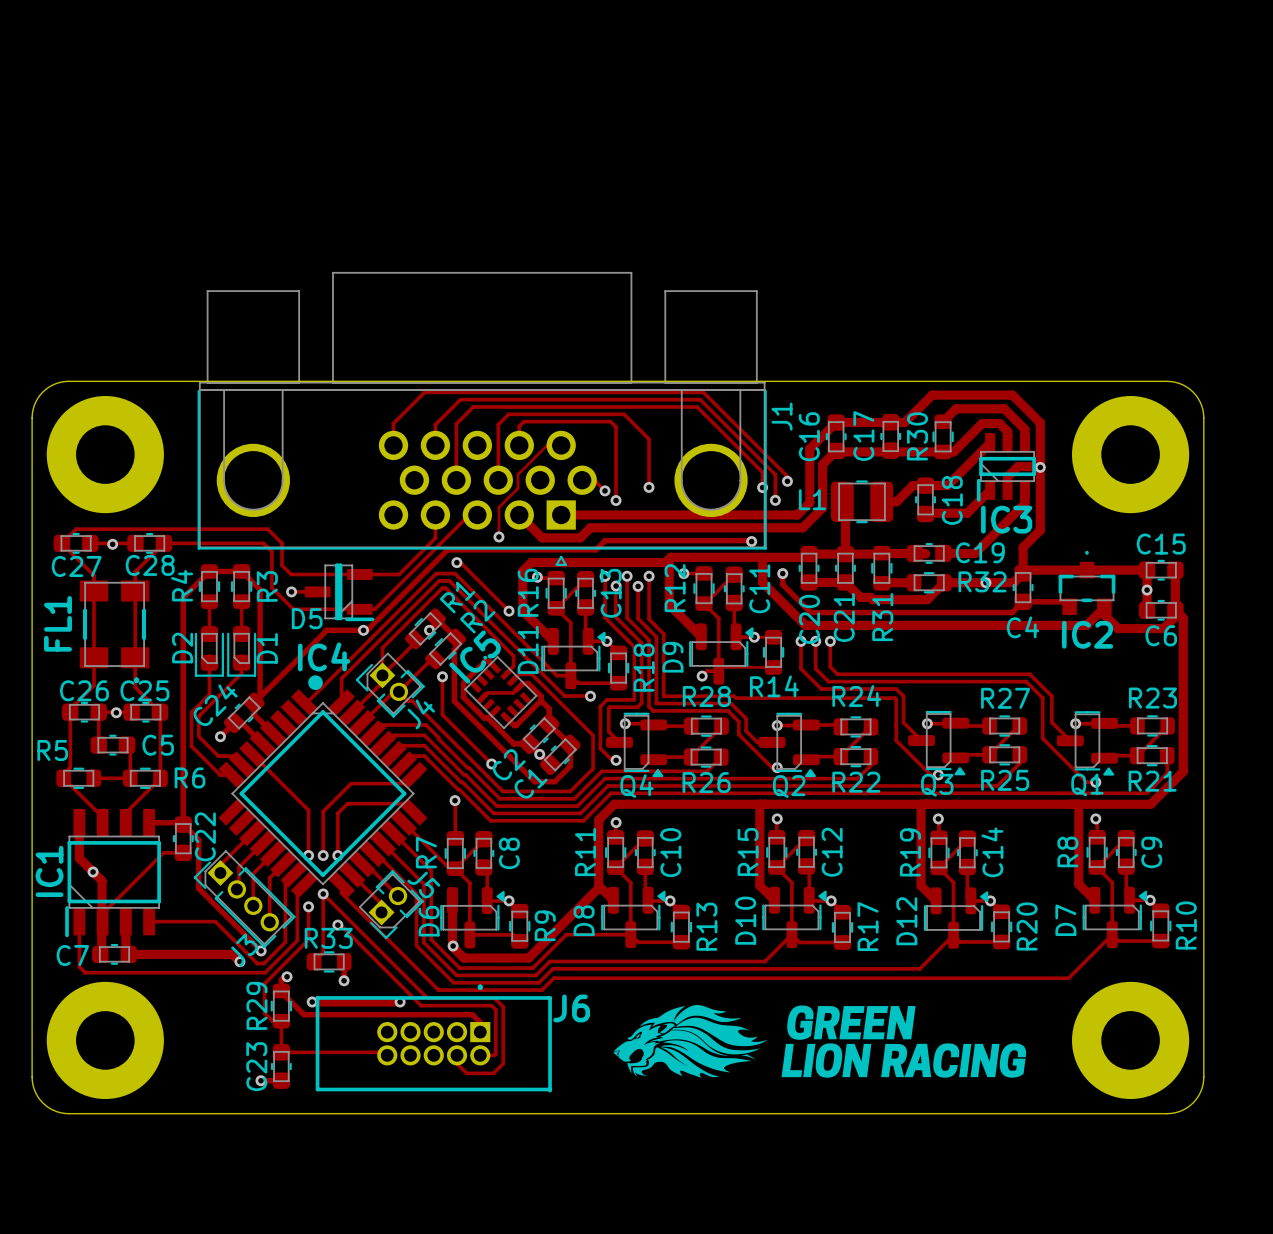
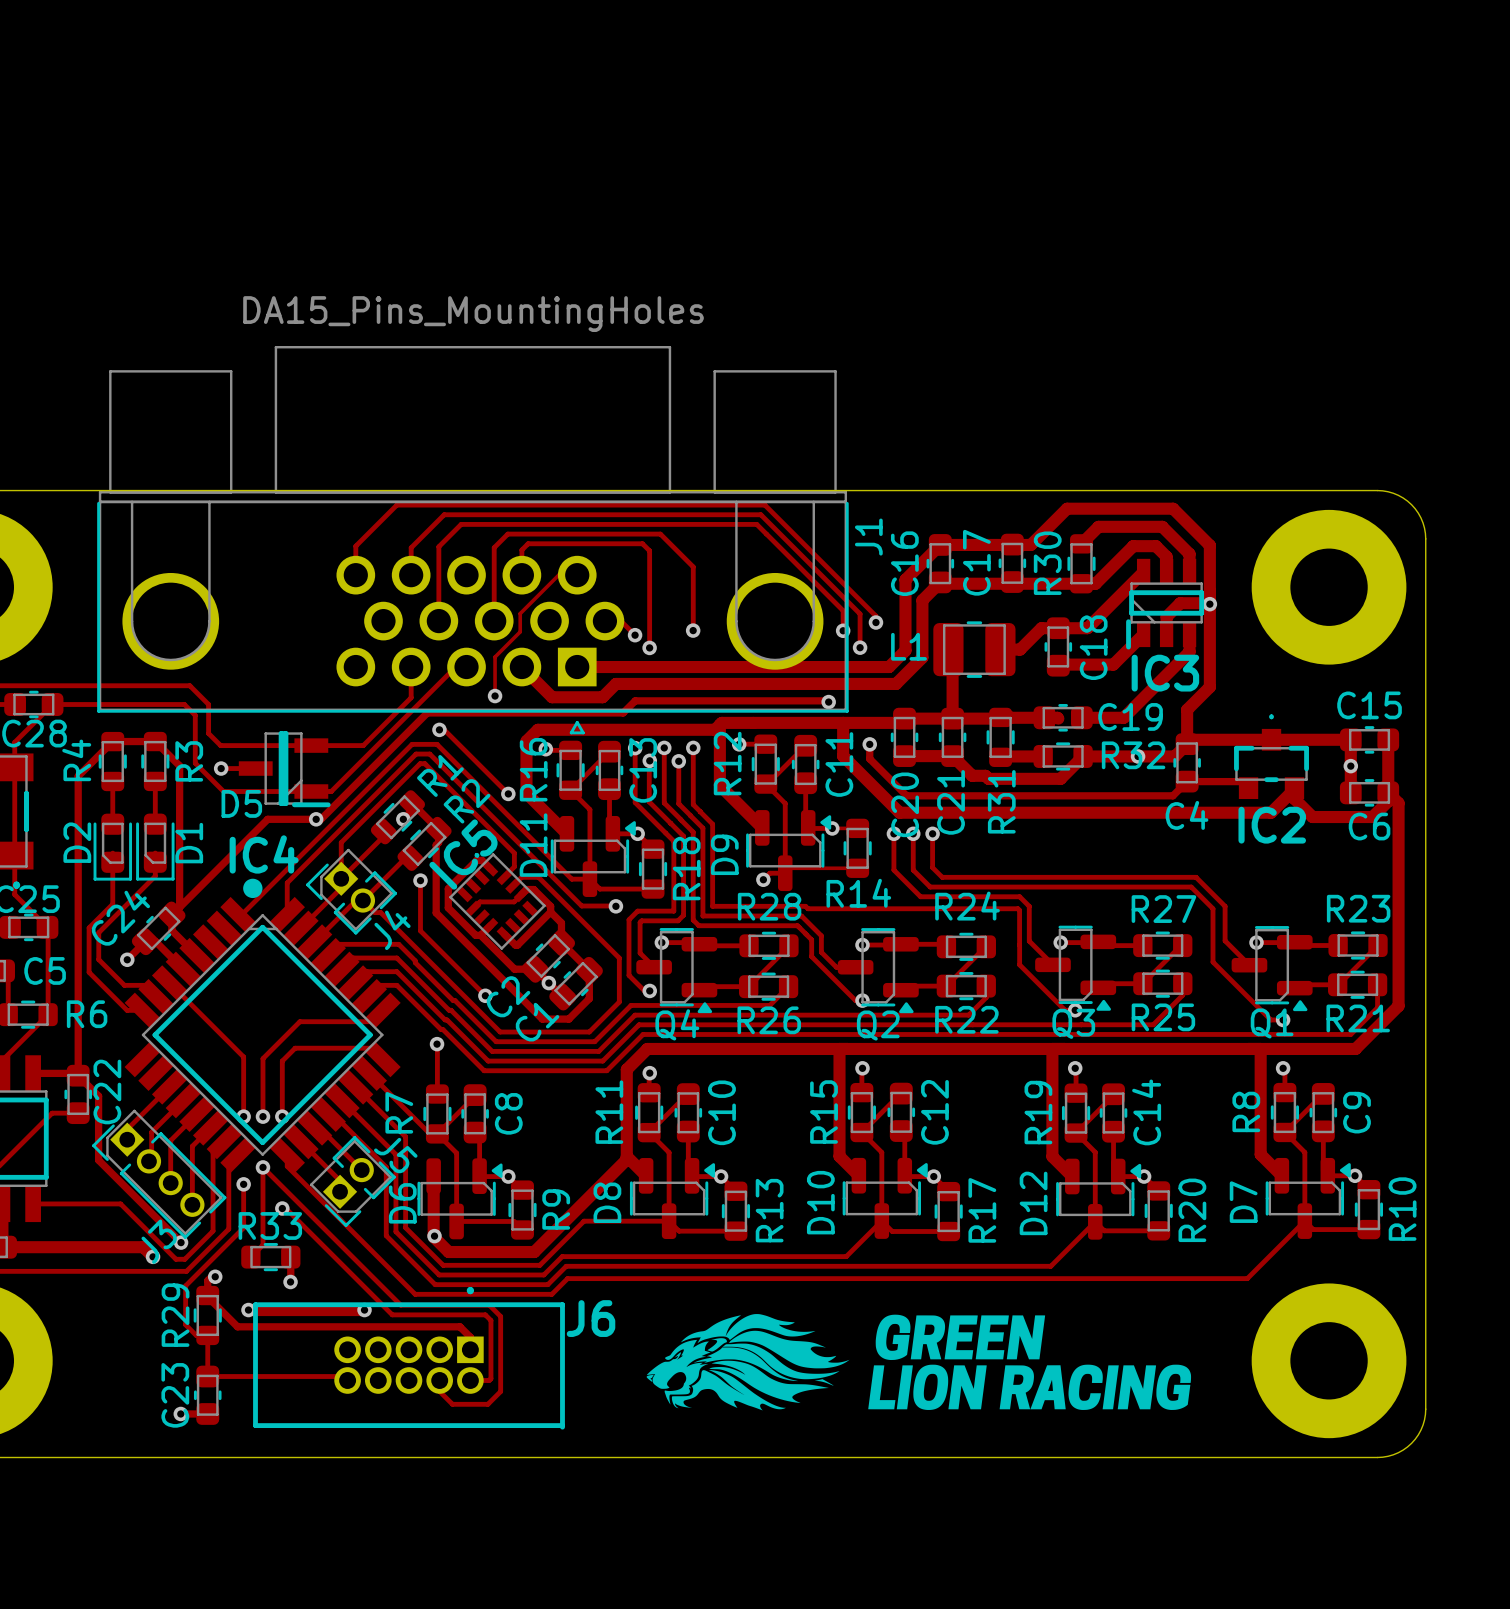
J1 value: none -> DA15_Pins_MountingHoles (473, 314)

